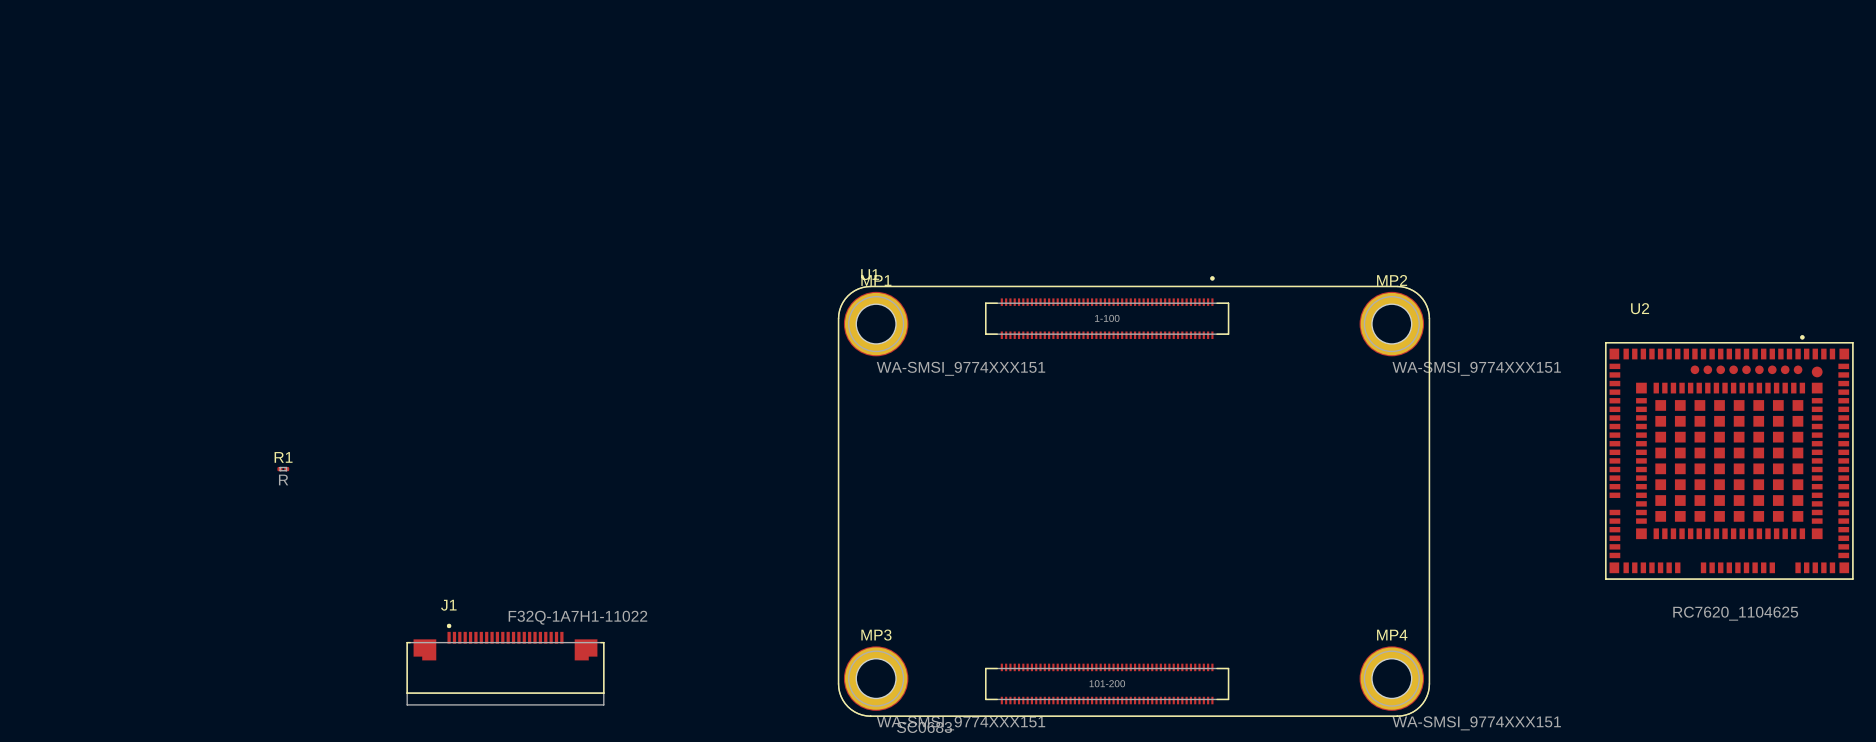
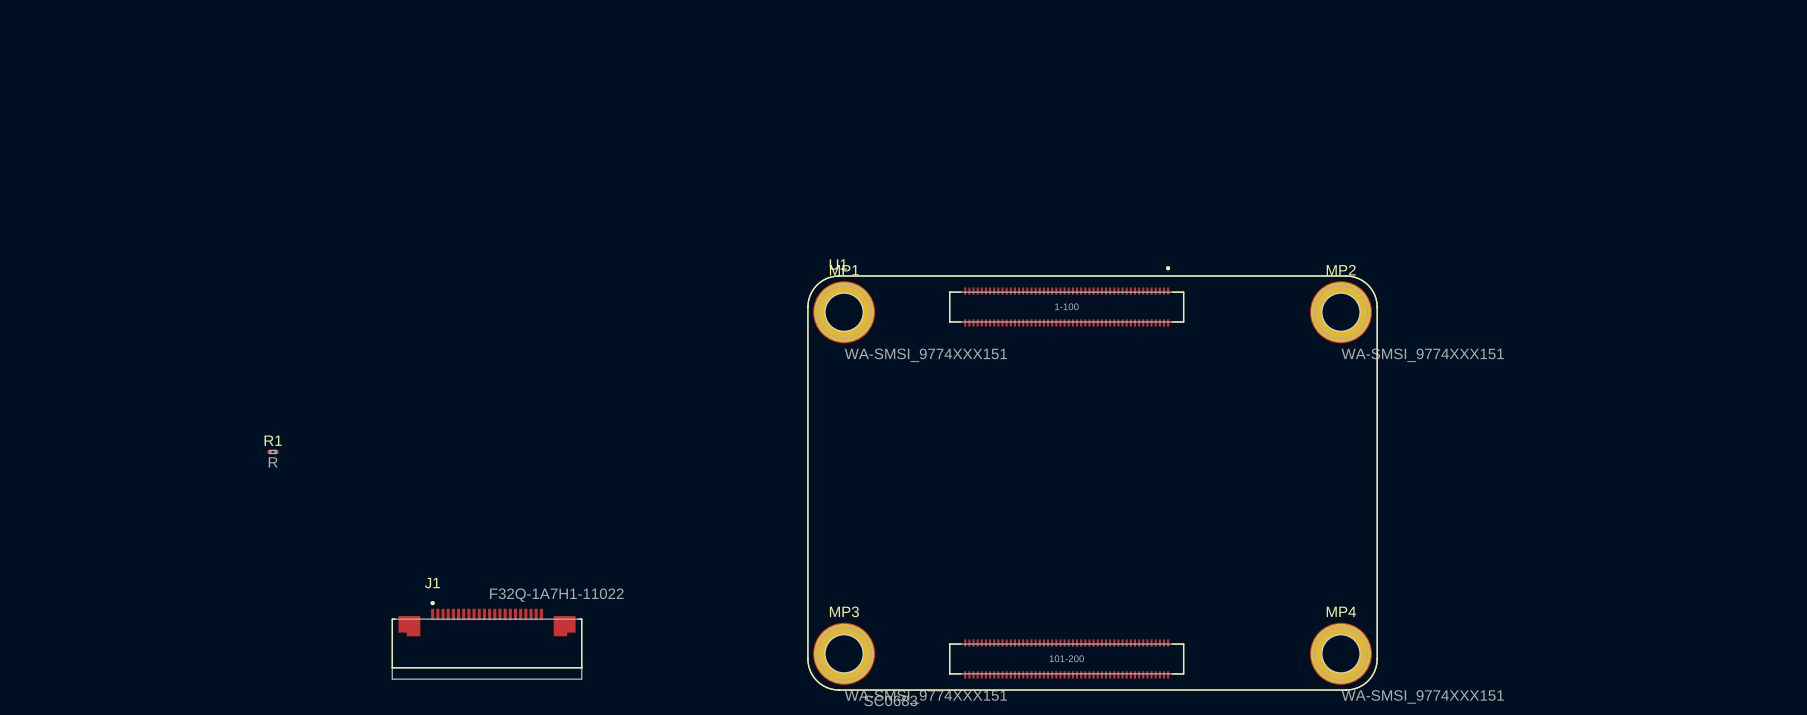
U2: RC7620_1104625 (1729, 457) -> none

